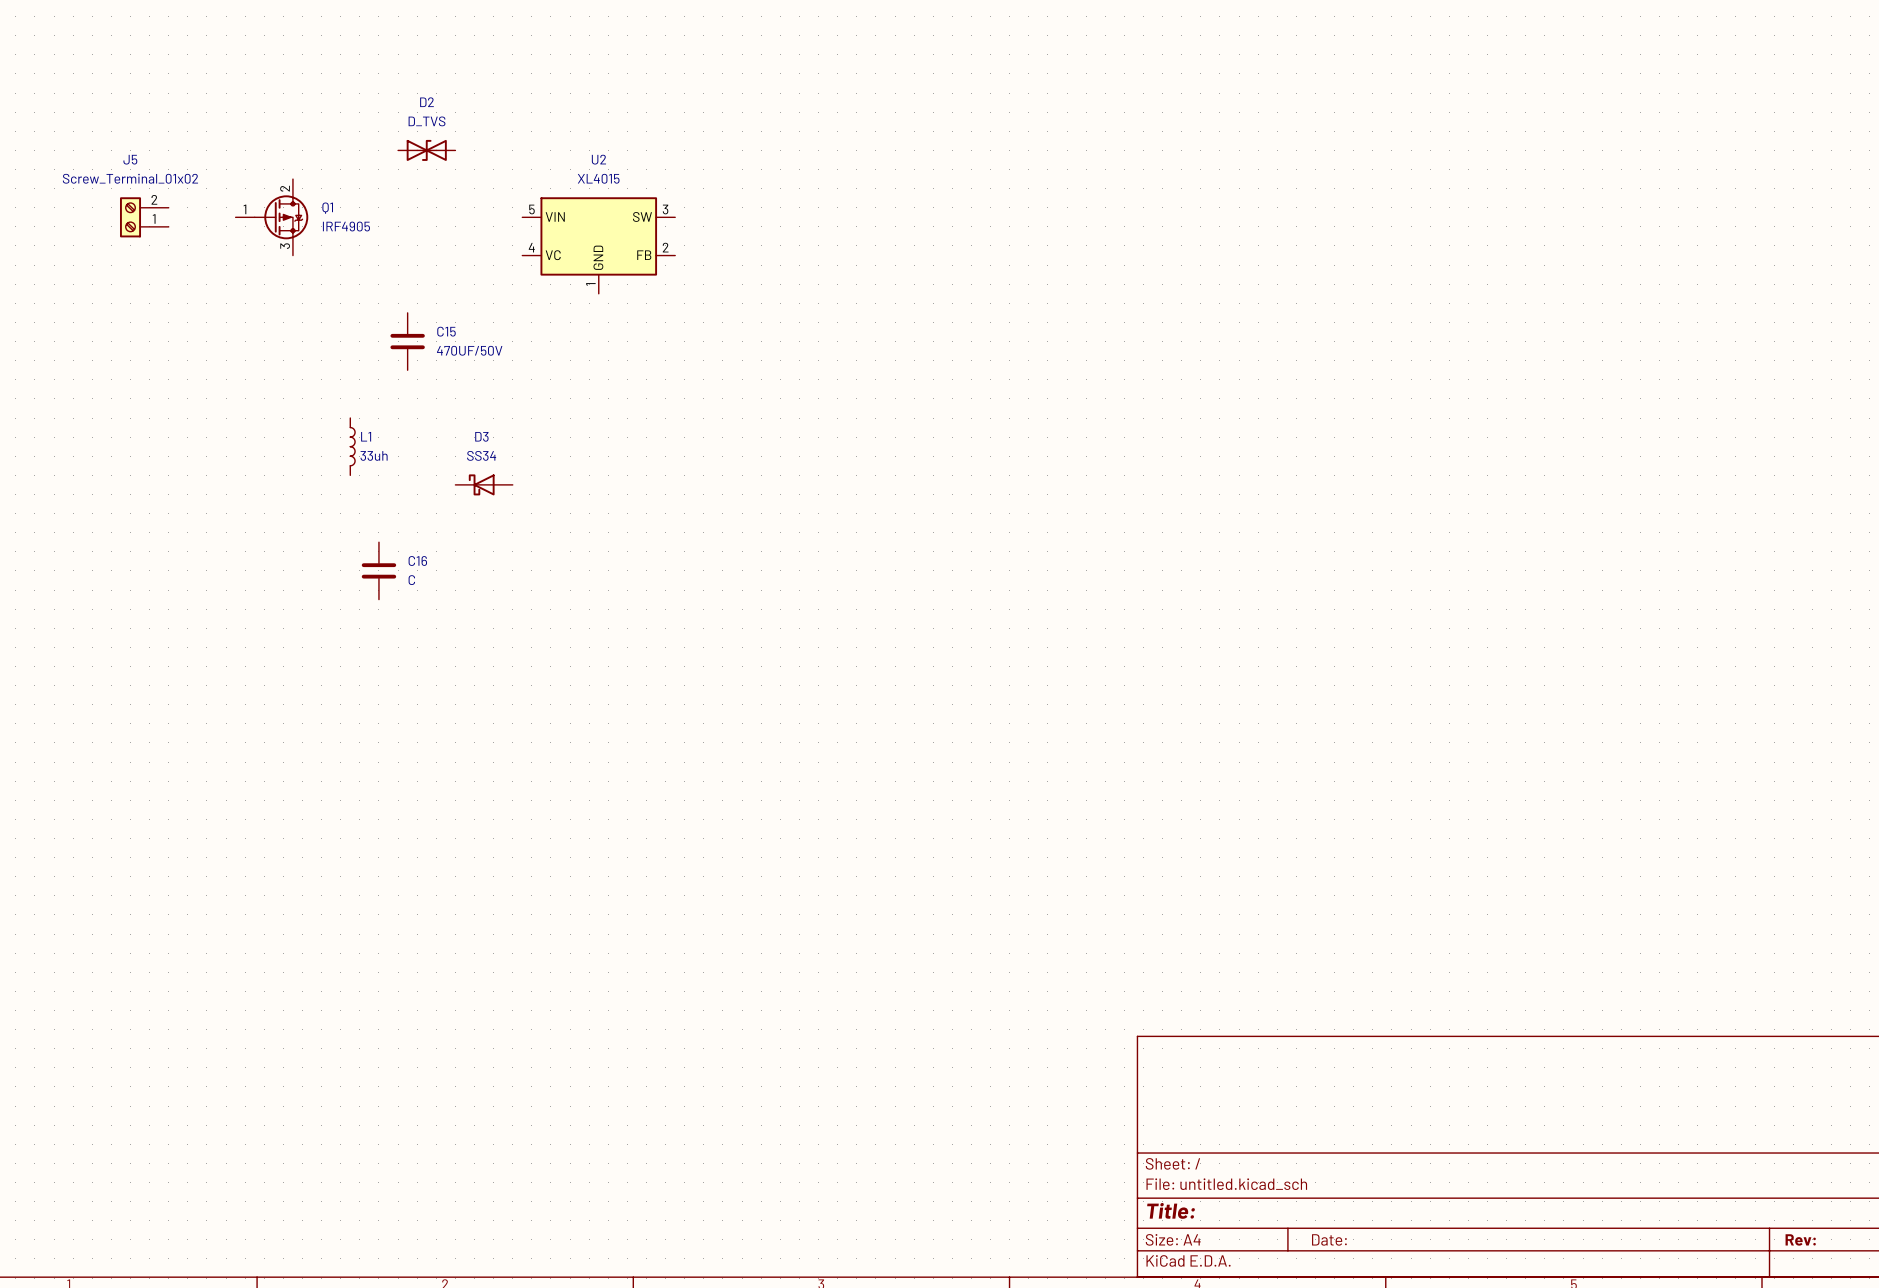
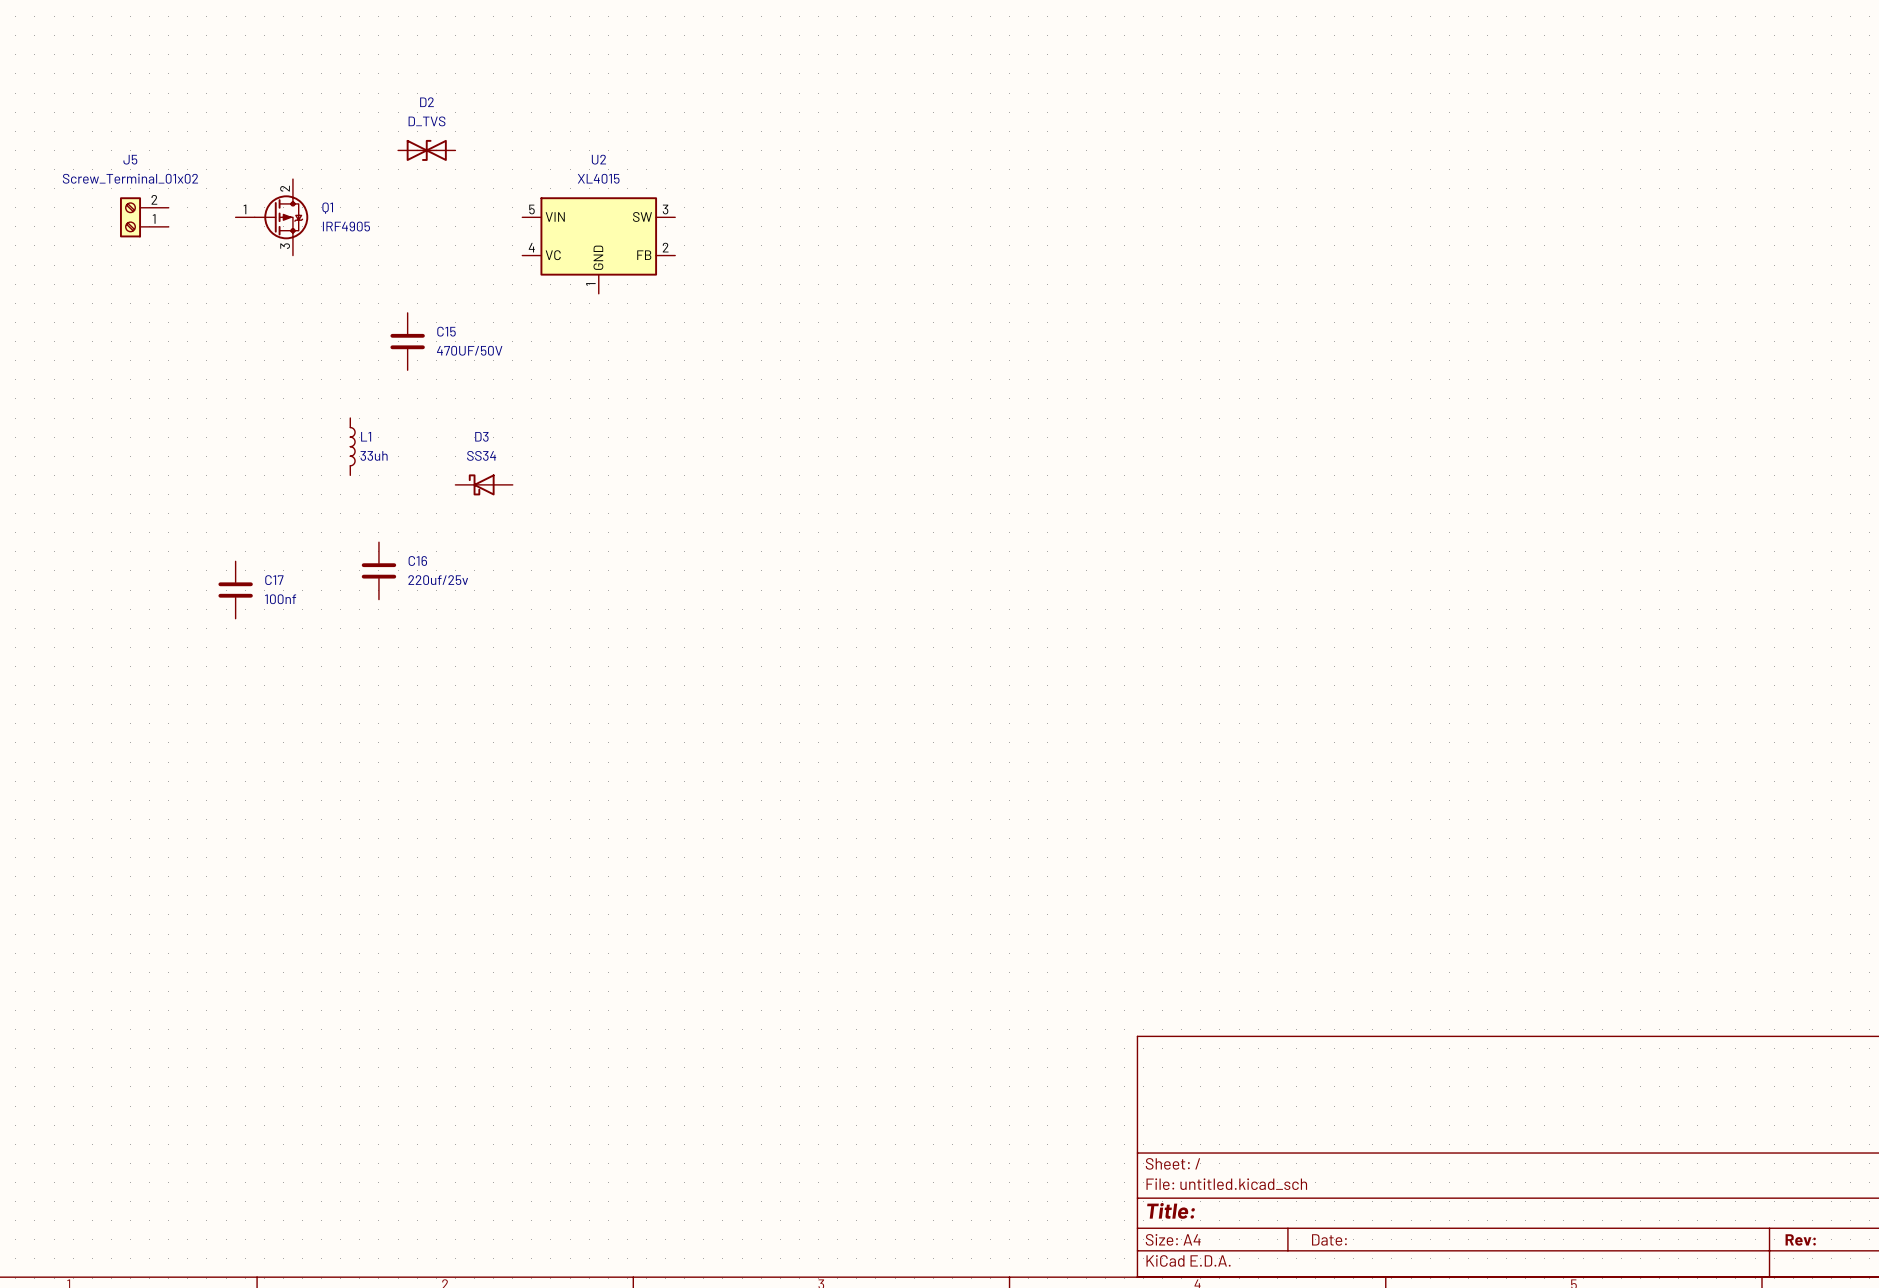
C16 value: C (411, 580) -> 220uf/25v (438, 580)
C17: none -> 100nf (235, 590)

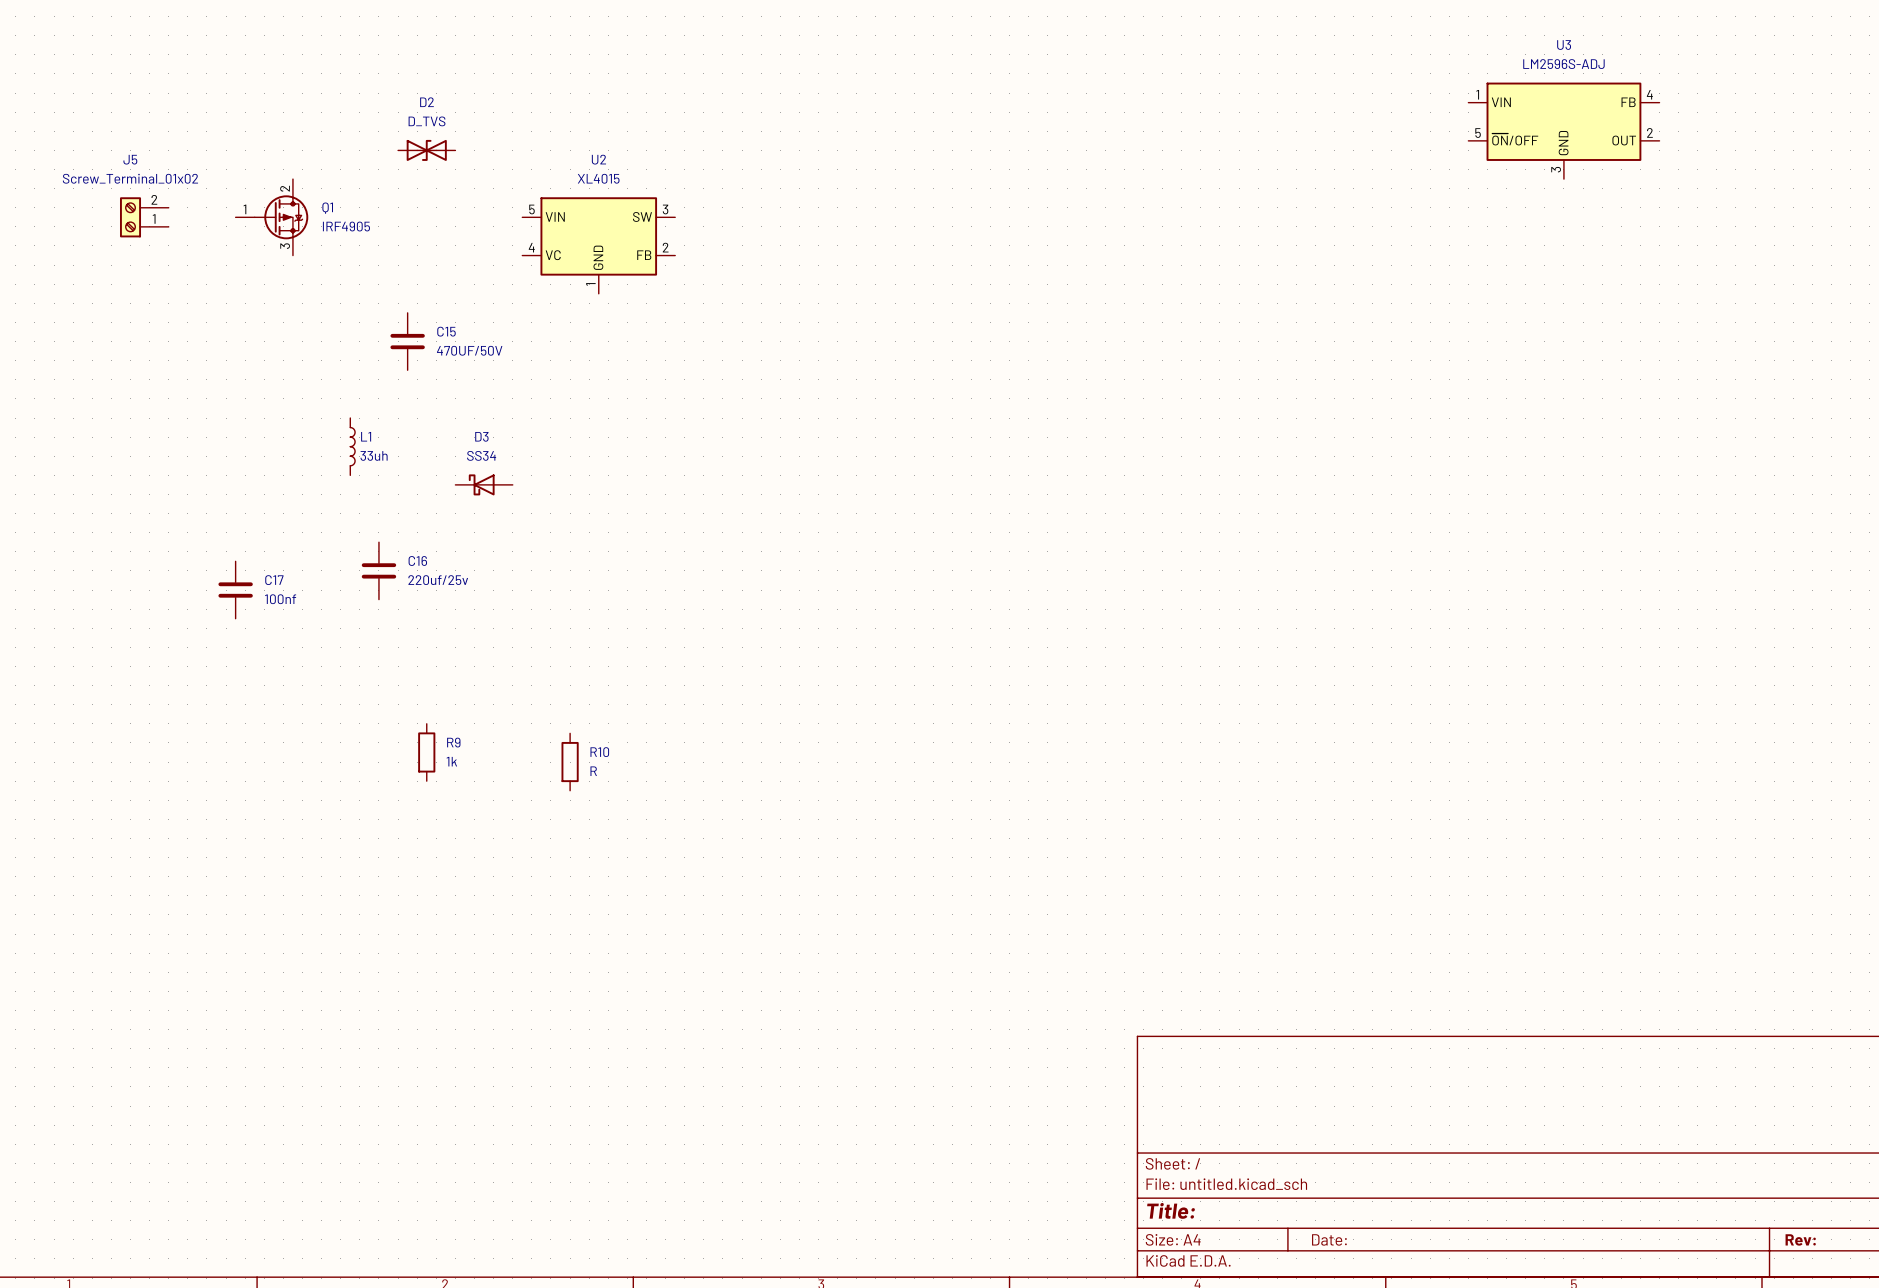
U3: none -> LM2596S-ADJ (1563, 130)
R9: none -> 1k (426, 752)
R10: none -> R (570, 762)

